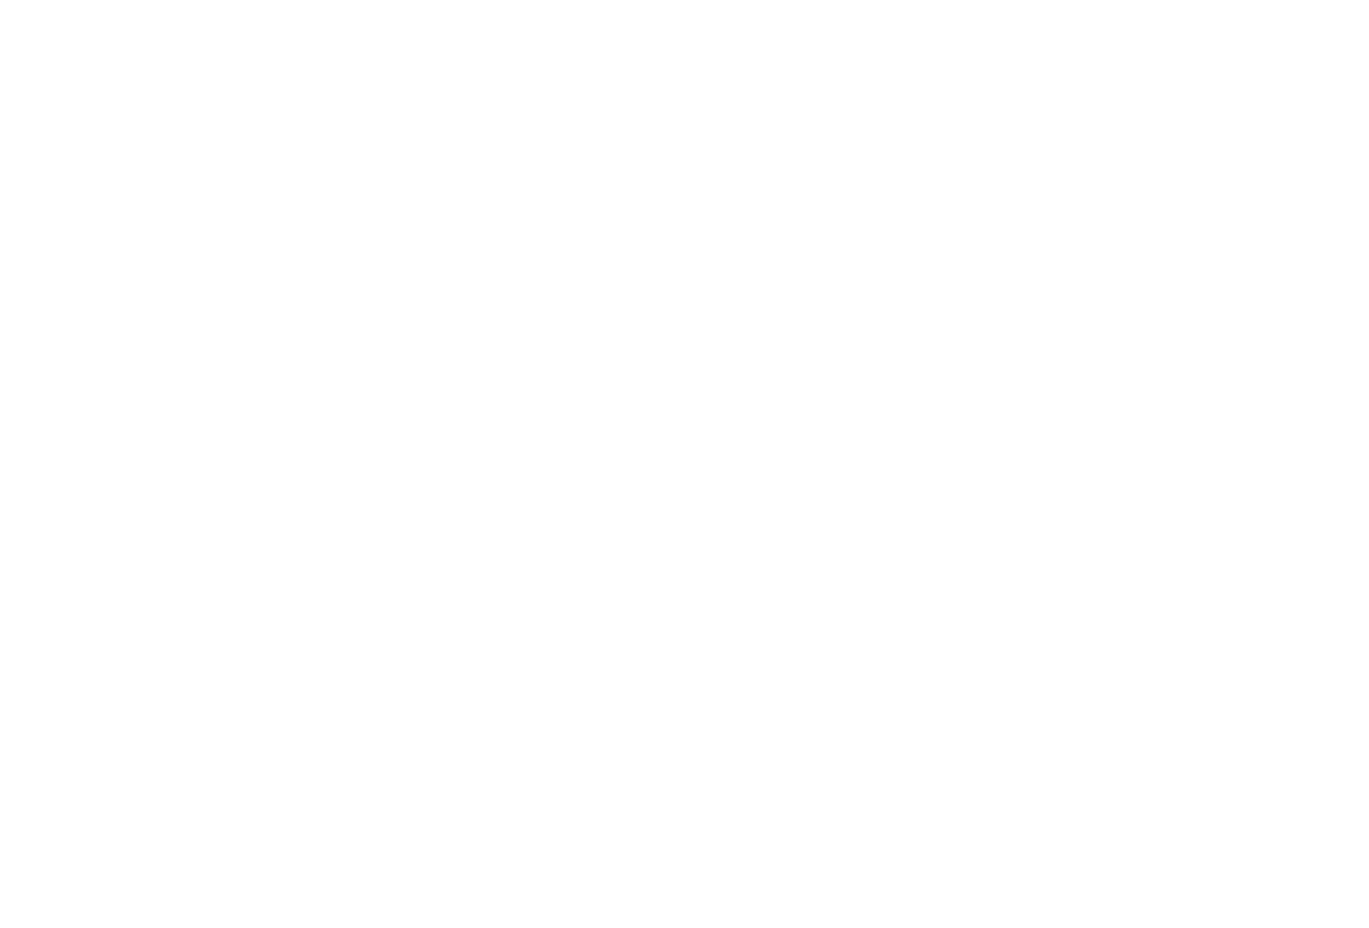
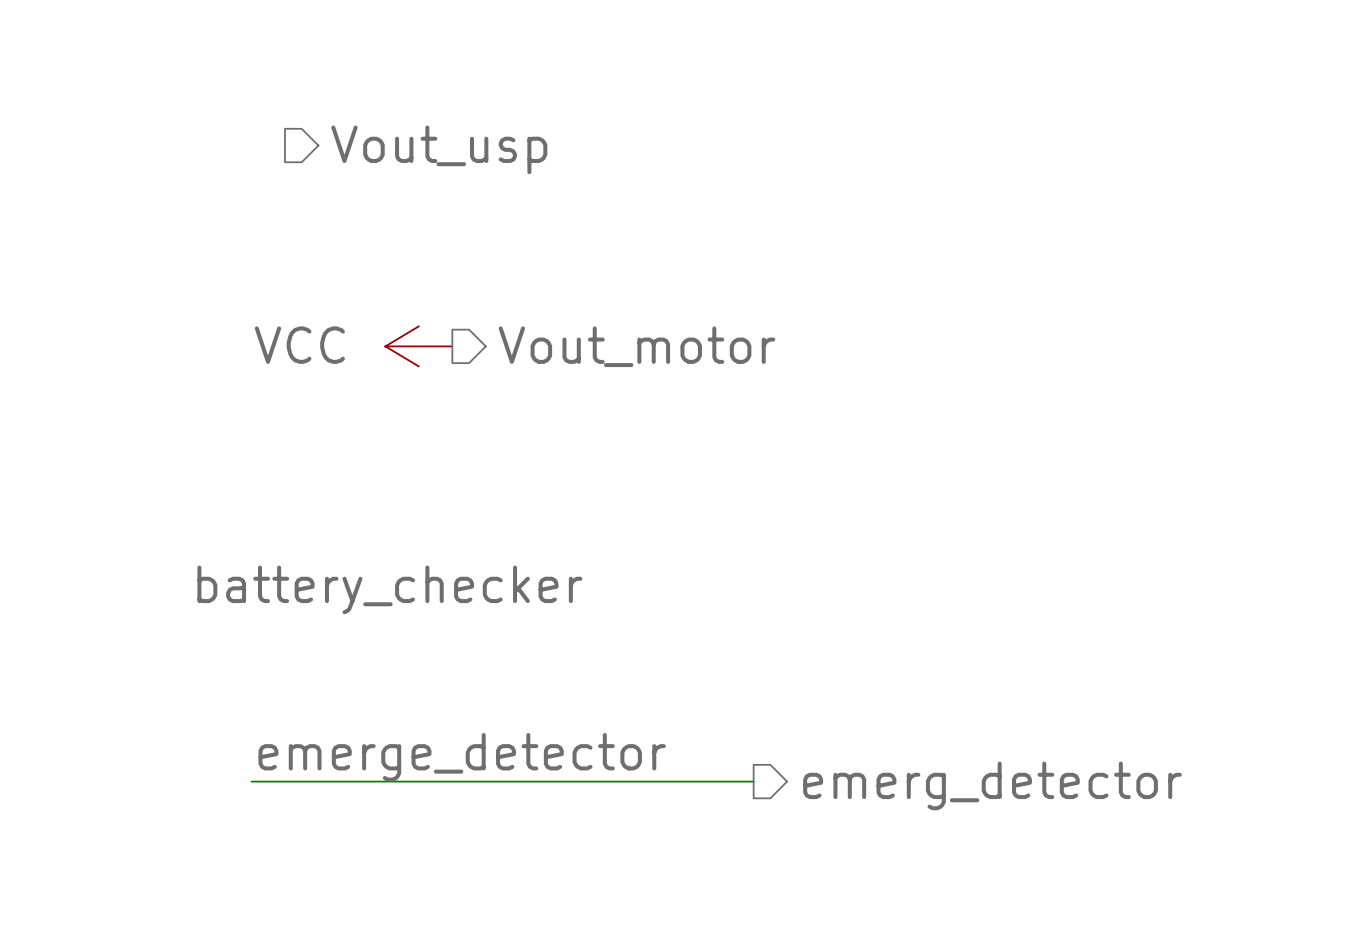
hierarchical label: none -> Vout_usp (439, 149)
power symbol: none -> VCC (418, 346)
hierarchical label: none -> Vout_motor (636, 346)
label: none -> battery_checker (389, 589)
label: none -> emerge_detector (462, 757)
wire: none -> (251, 781) (753, 781)
hierarchical label: none -> emerg_detector (992, 785)

